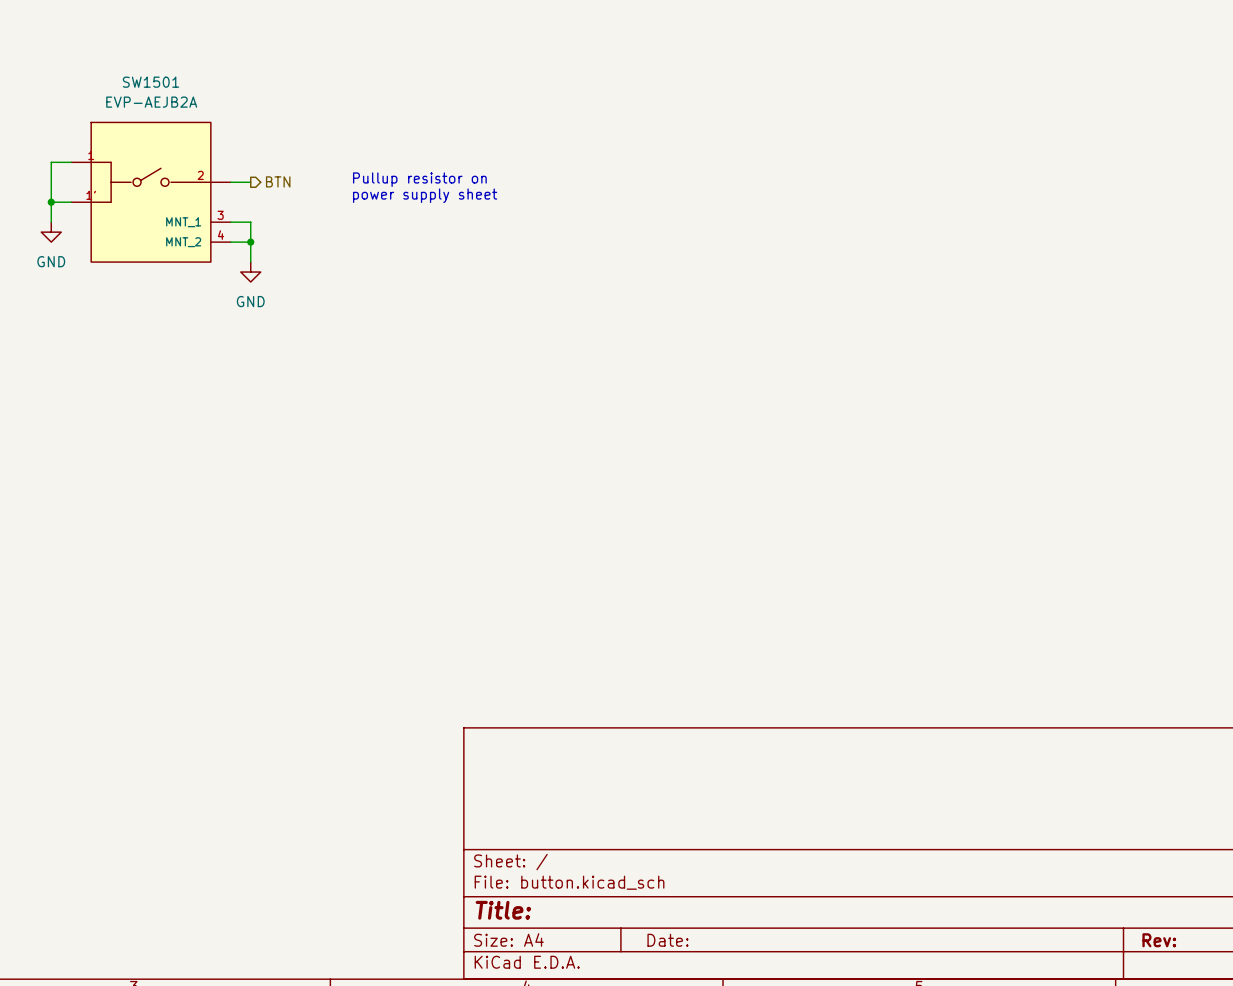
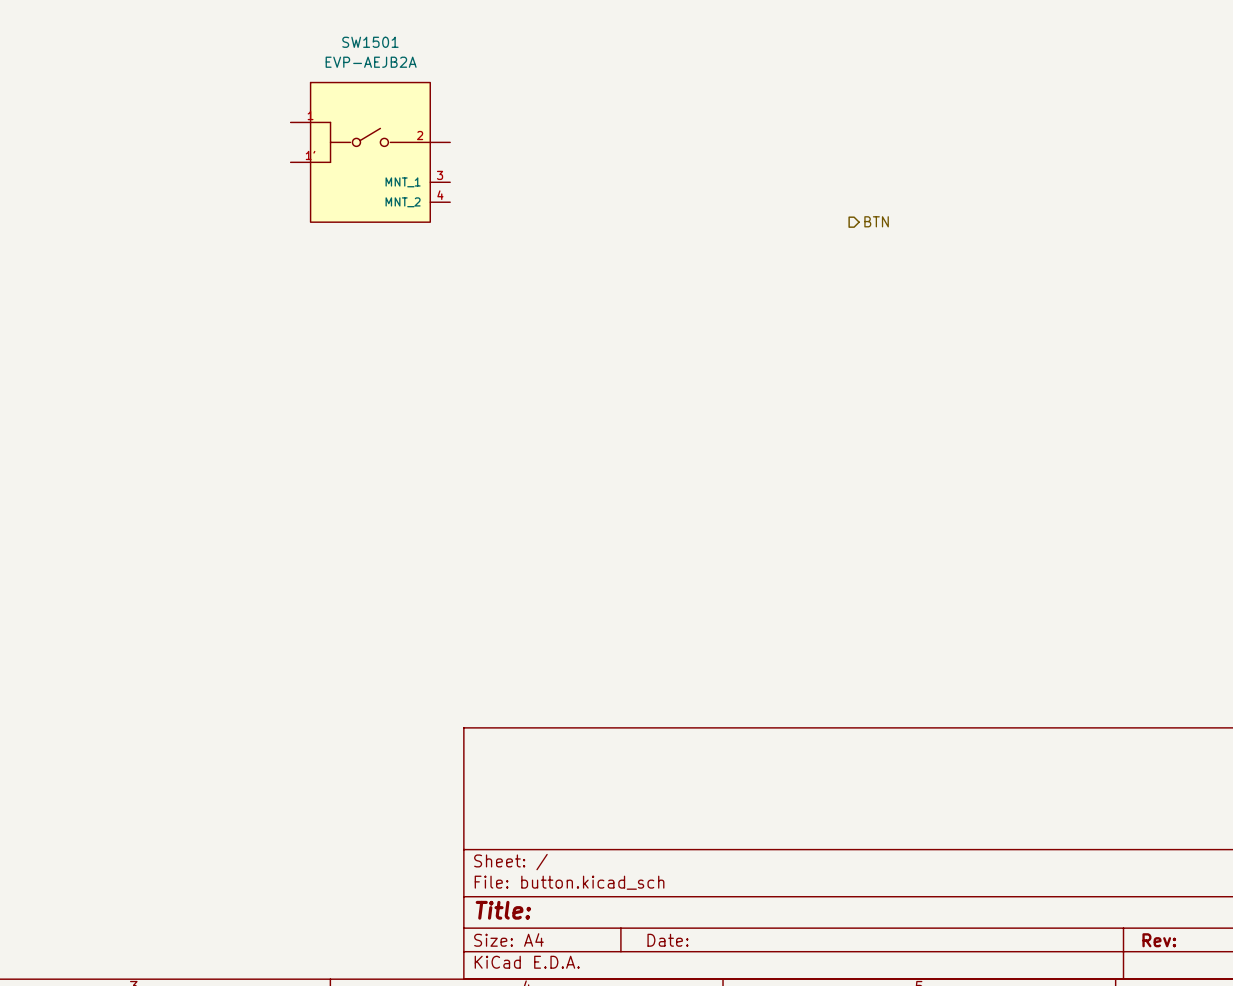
wire: (71, 162) (51, 162) (51, 222) -> none
text: Pullup resistor on (419, 179) -> none
hierarchical label: BTN (278, 181) -> none
wire: (230, 182) (250, 182) -> none
SW1501 position: (151, 192) -> (370, 152)
text: power supply sheet (425, 195) -> none
wire: (51, 202) (71, 202) -> none
junction: (51, 202) -> none
hierarchical label: none -> BTN (876, 221)
wire: (230, 222) (250, 222) (250, 262) -> none
power symbol: GND (51, 232) -> none
wire: (230, 242) (250, 242) -> none
junction: (250, 242) -> none
power symbol: GND (250, 272) -> none

